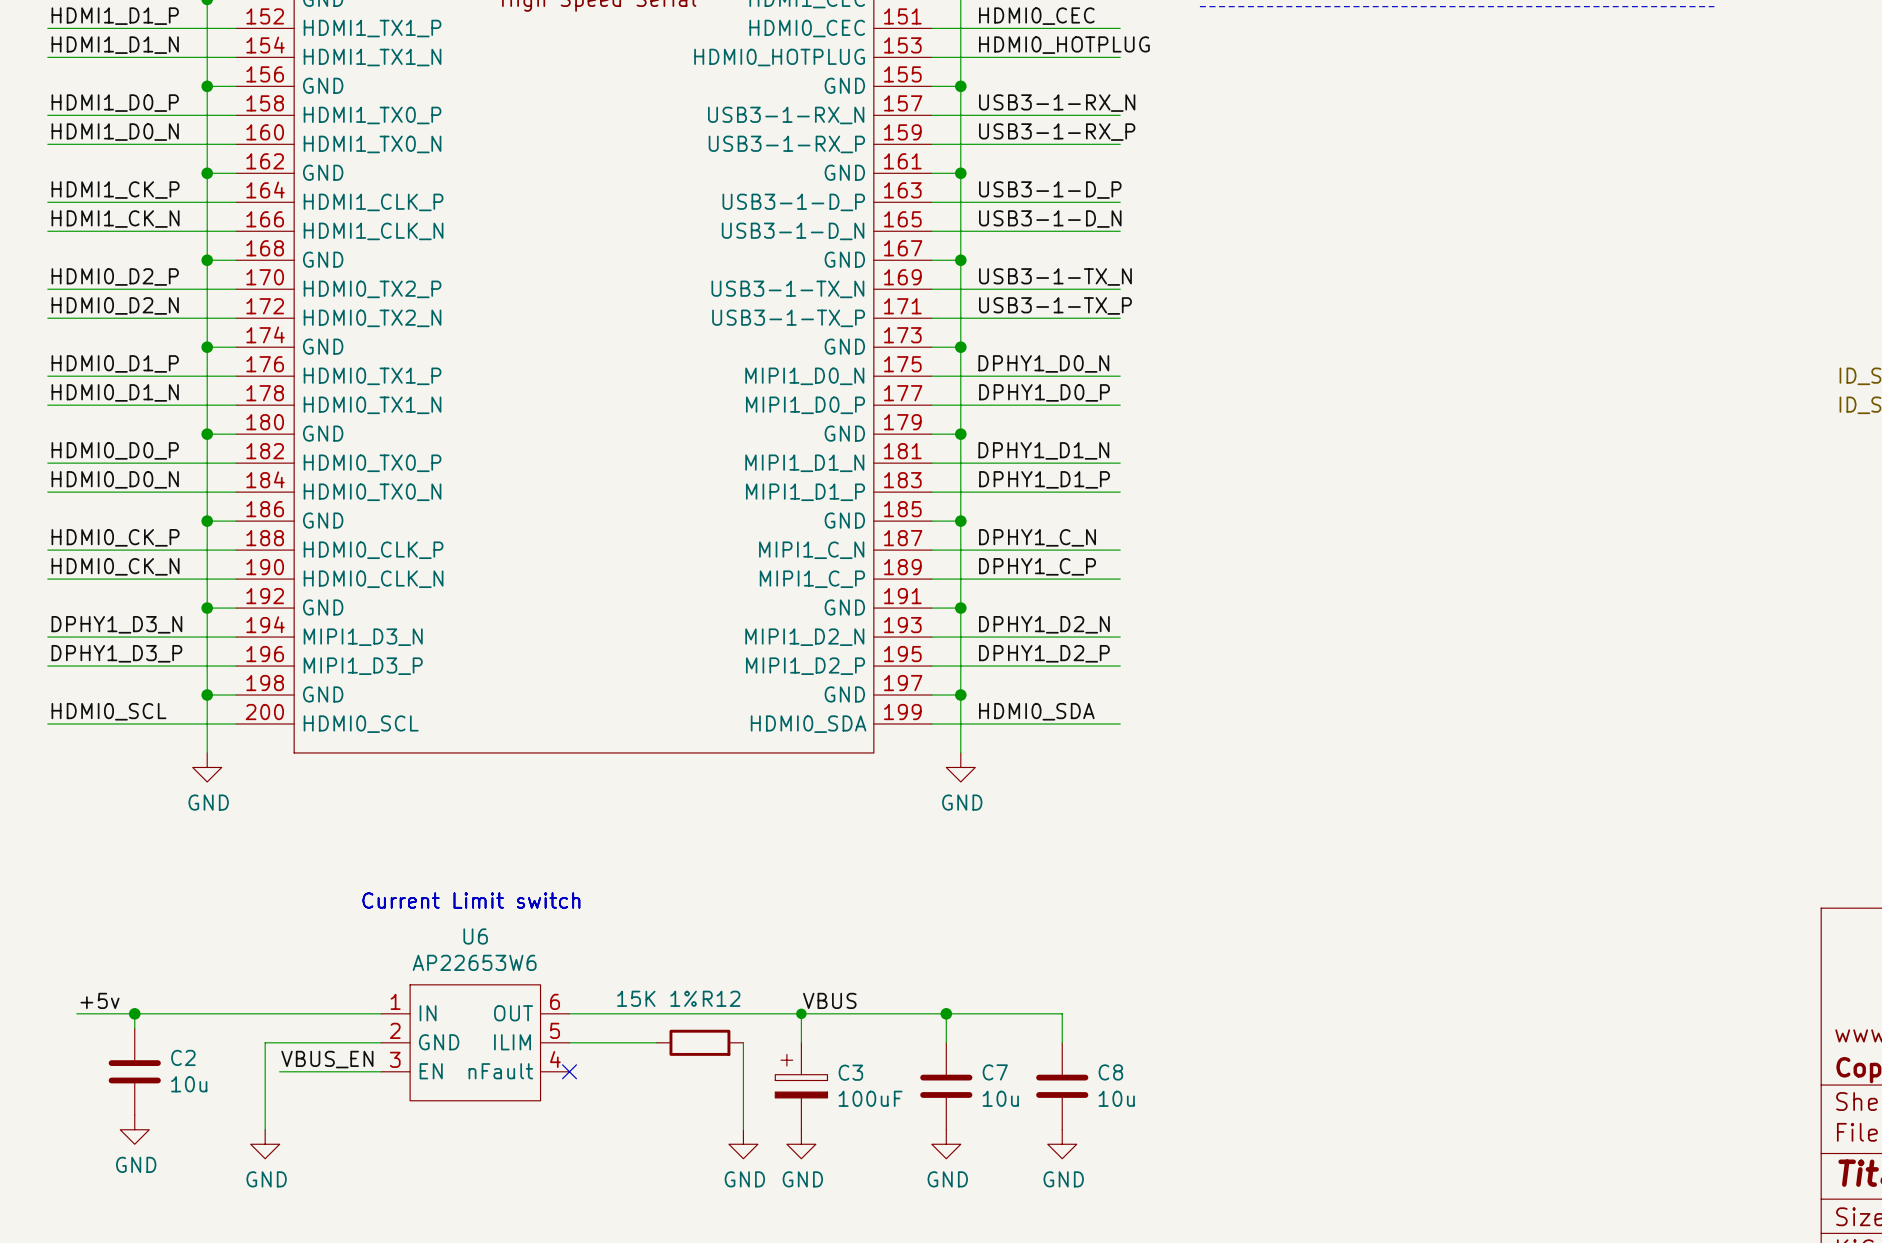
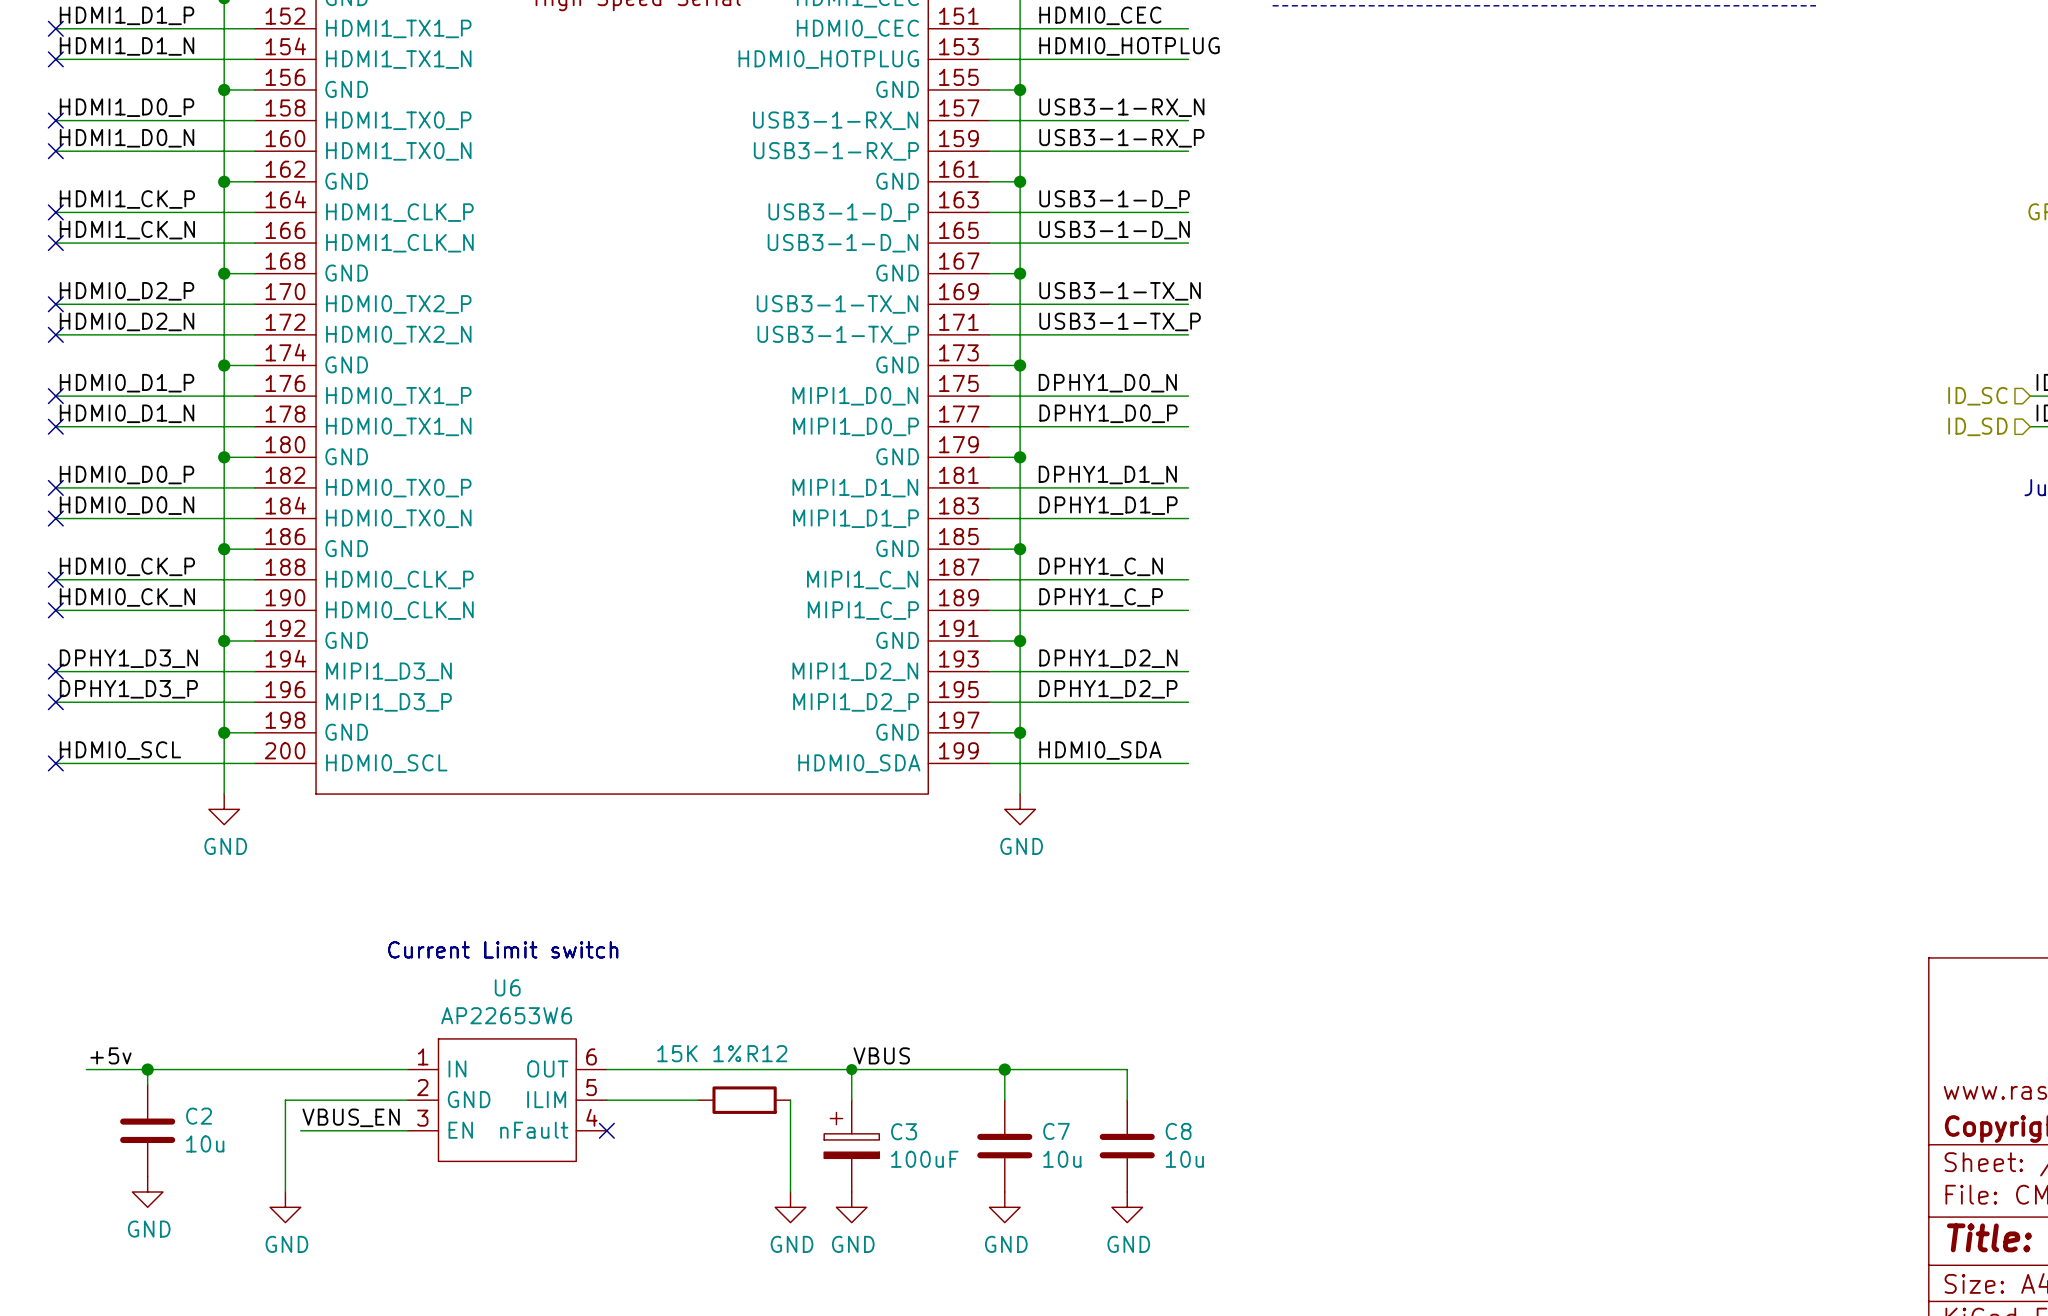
no-connect mark: none -> (55, 28)
no-connect mark: none -> (55, 59)
no-connect mark: none -> (55, 120)
no-connect mark: none -> (55, 151)
no-connect mark: none -> (55, 212)
no-connect mark: none -> (55, 243)
no-connect mark: none -> (55, 304)
no-connect mark: none -> (55, 334)
no-connect mark: none -> (55, 396)
no-connect mark: none -> (55, 426)
no-connect mark: none -> (55, 487)
no-connect mark: none -> (55, 518)
no-connect mark: none -> (55, 579)
no-connect mark: none -> (55, 610)
no-connect mark: none -> (55, 671)
no-connect mark: none -> (55, 702)
no-connect mark: none -> (55, 763)

